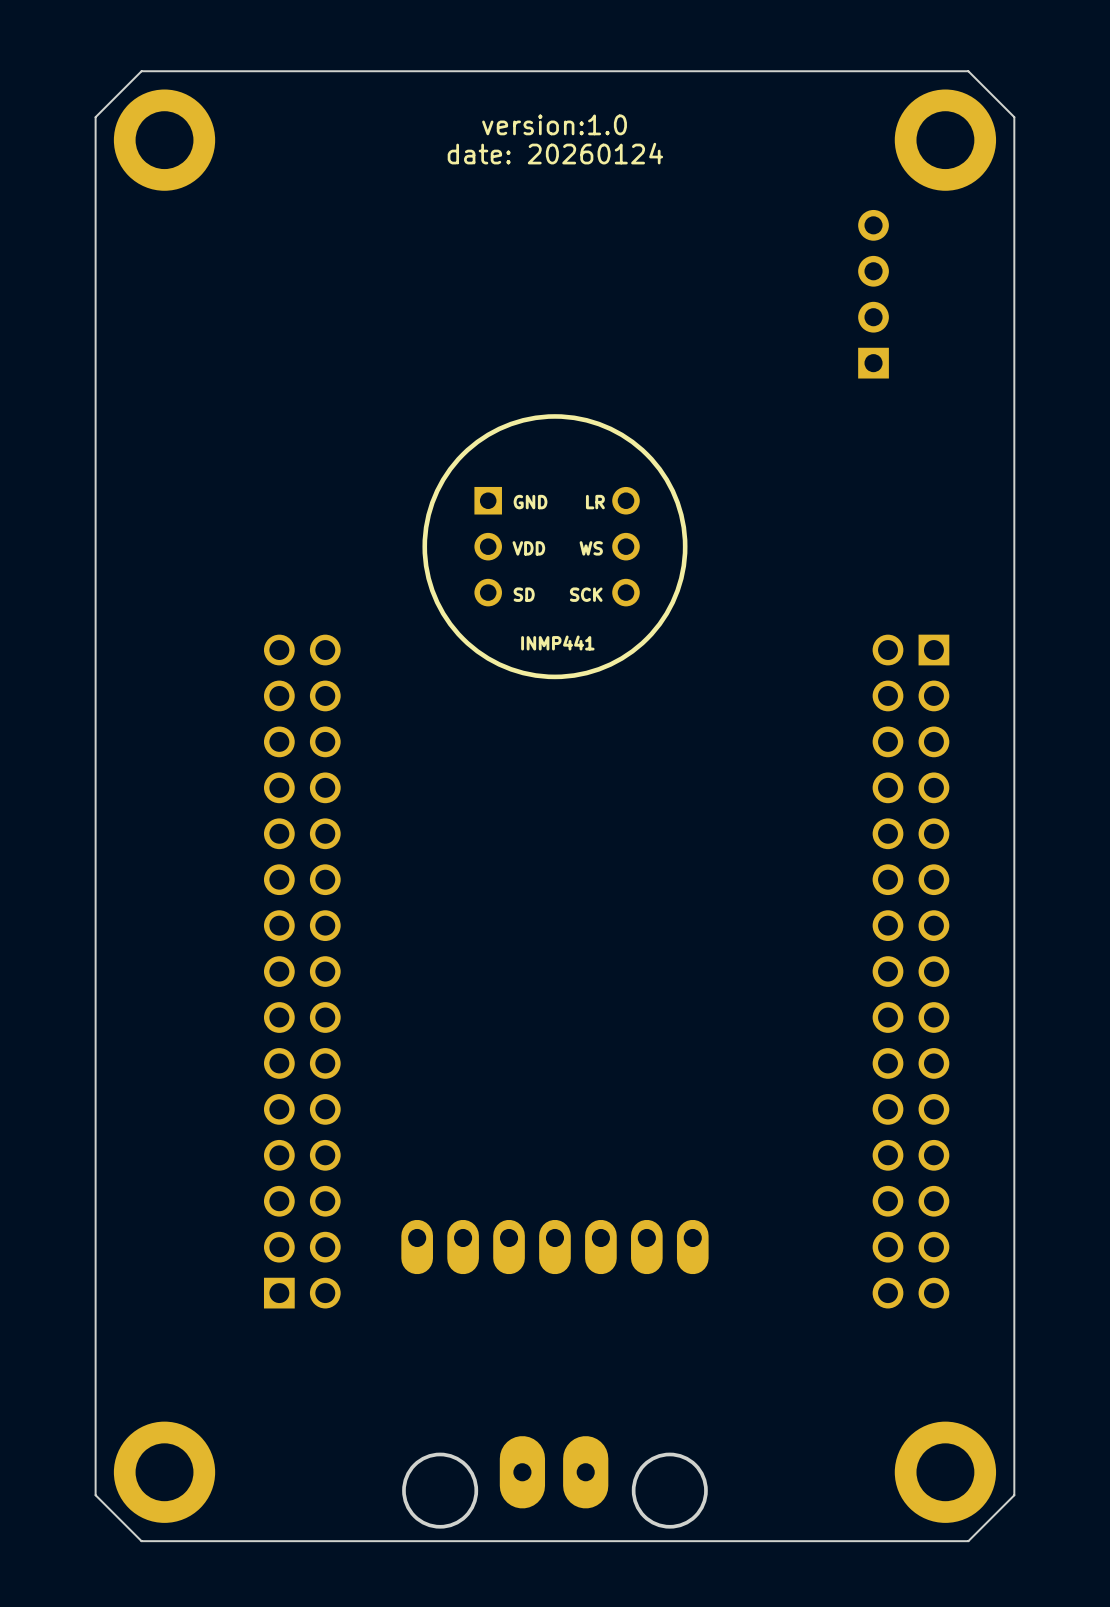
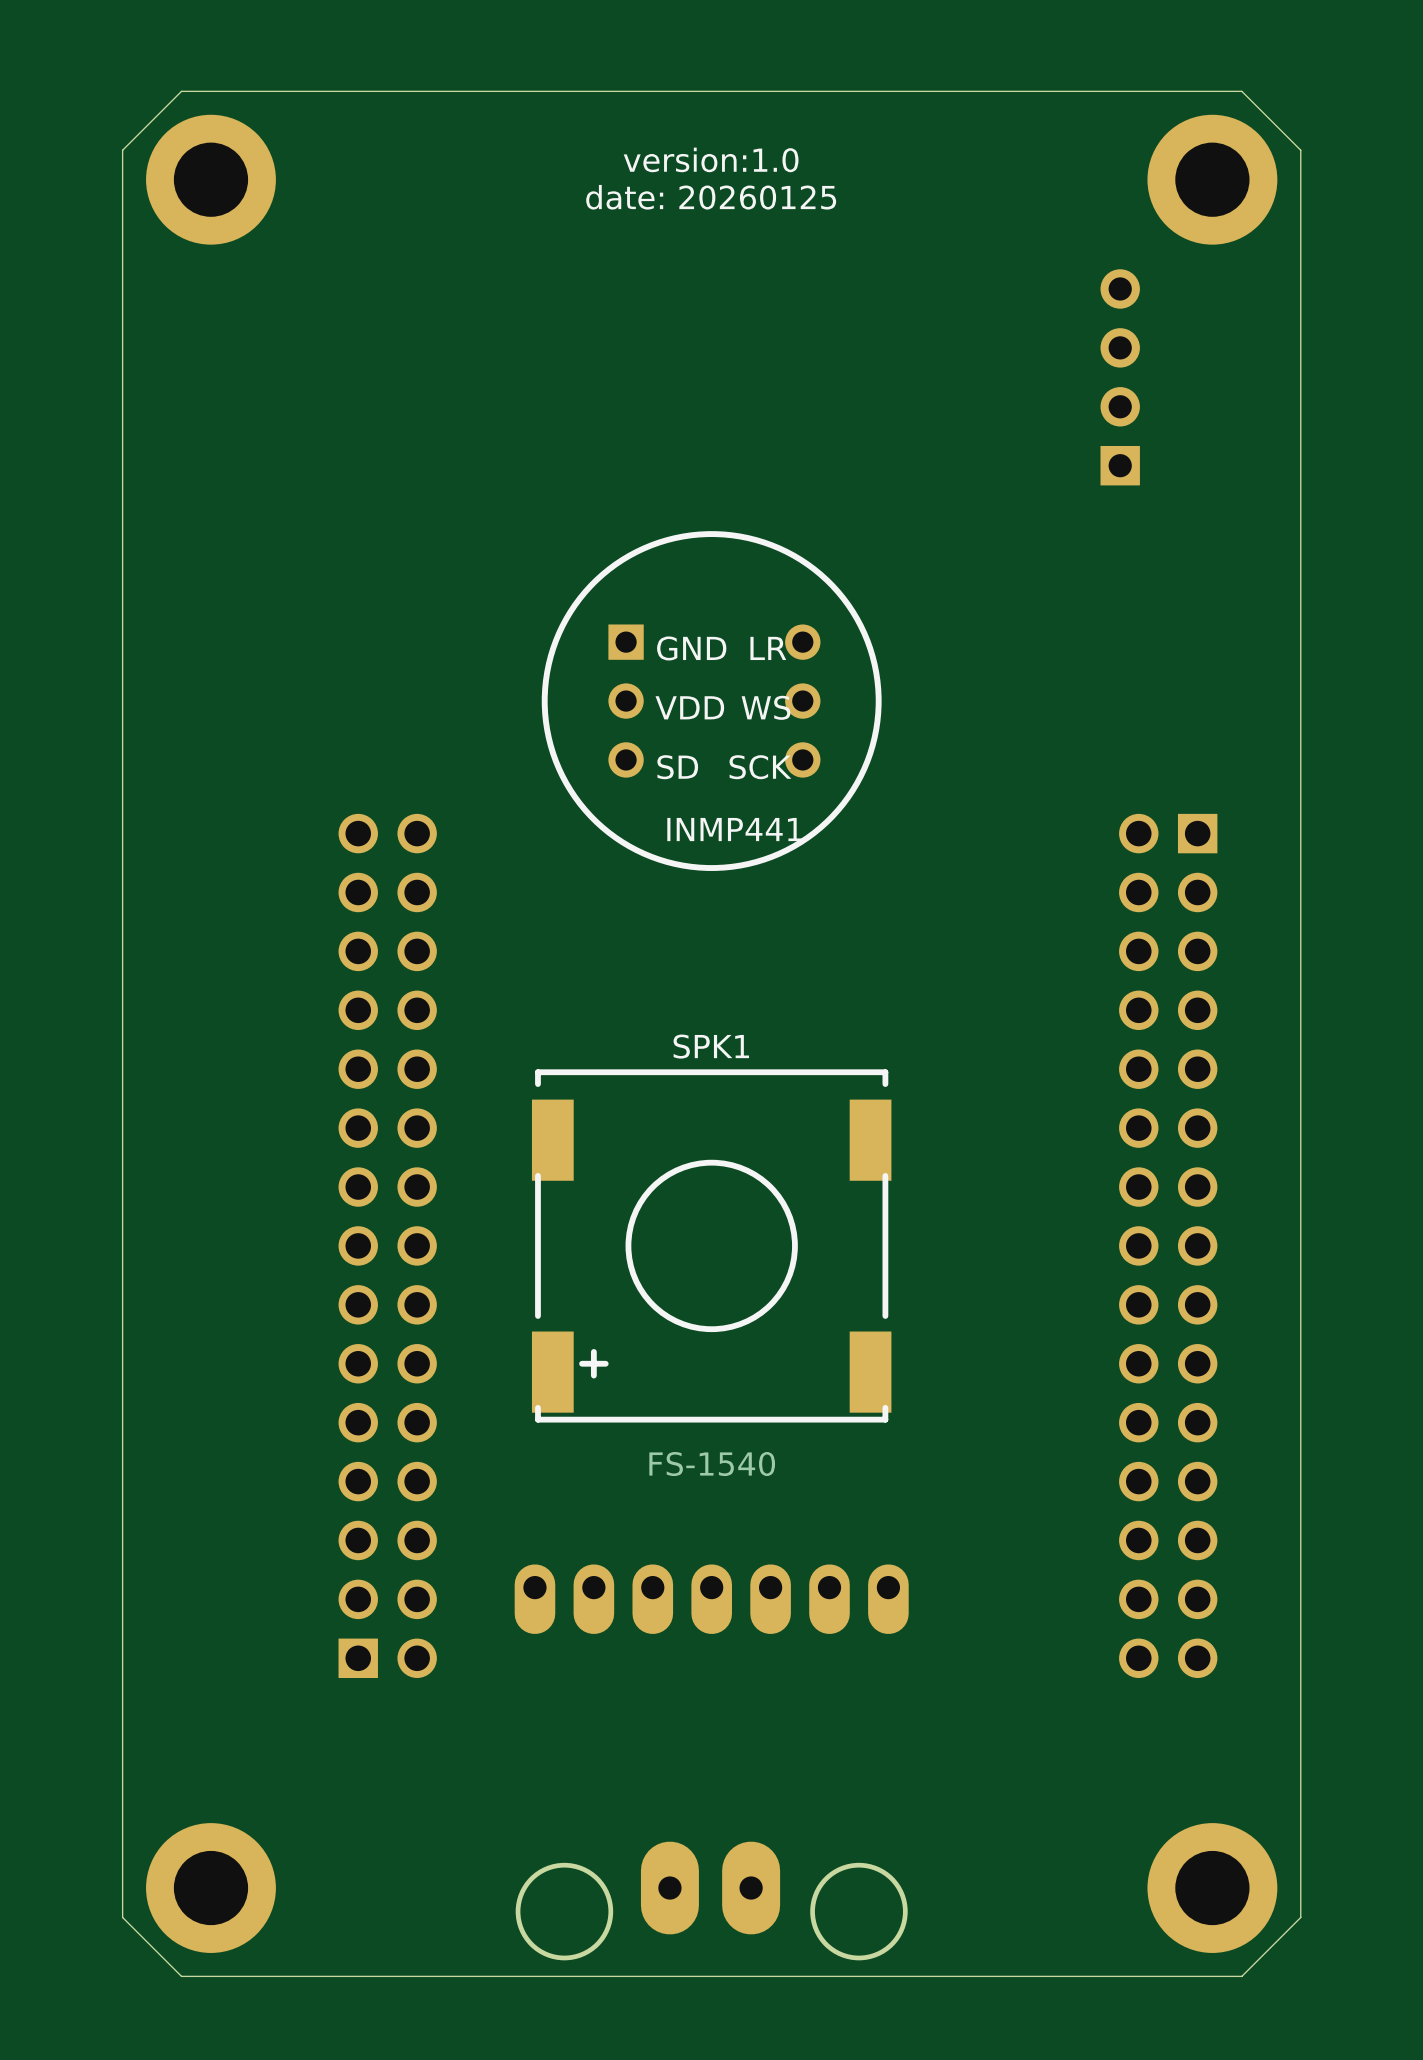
text: date: 20260124 (555, 153) -> date: 20260125 (711, 197)
part footprint: [422, 414, 688, 680] -> [541, 531, 882, 871]
SPK1: none -> FS-1540 (711, 1245)

